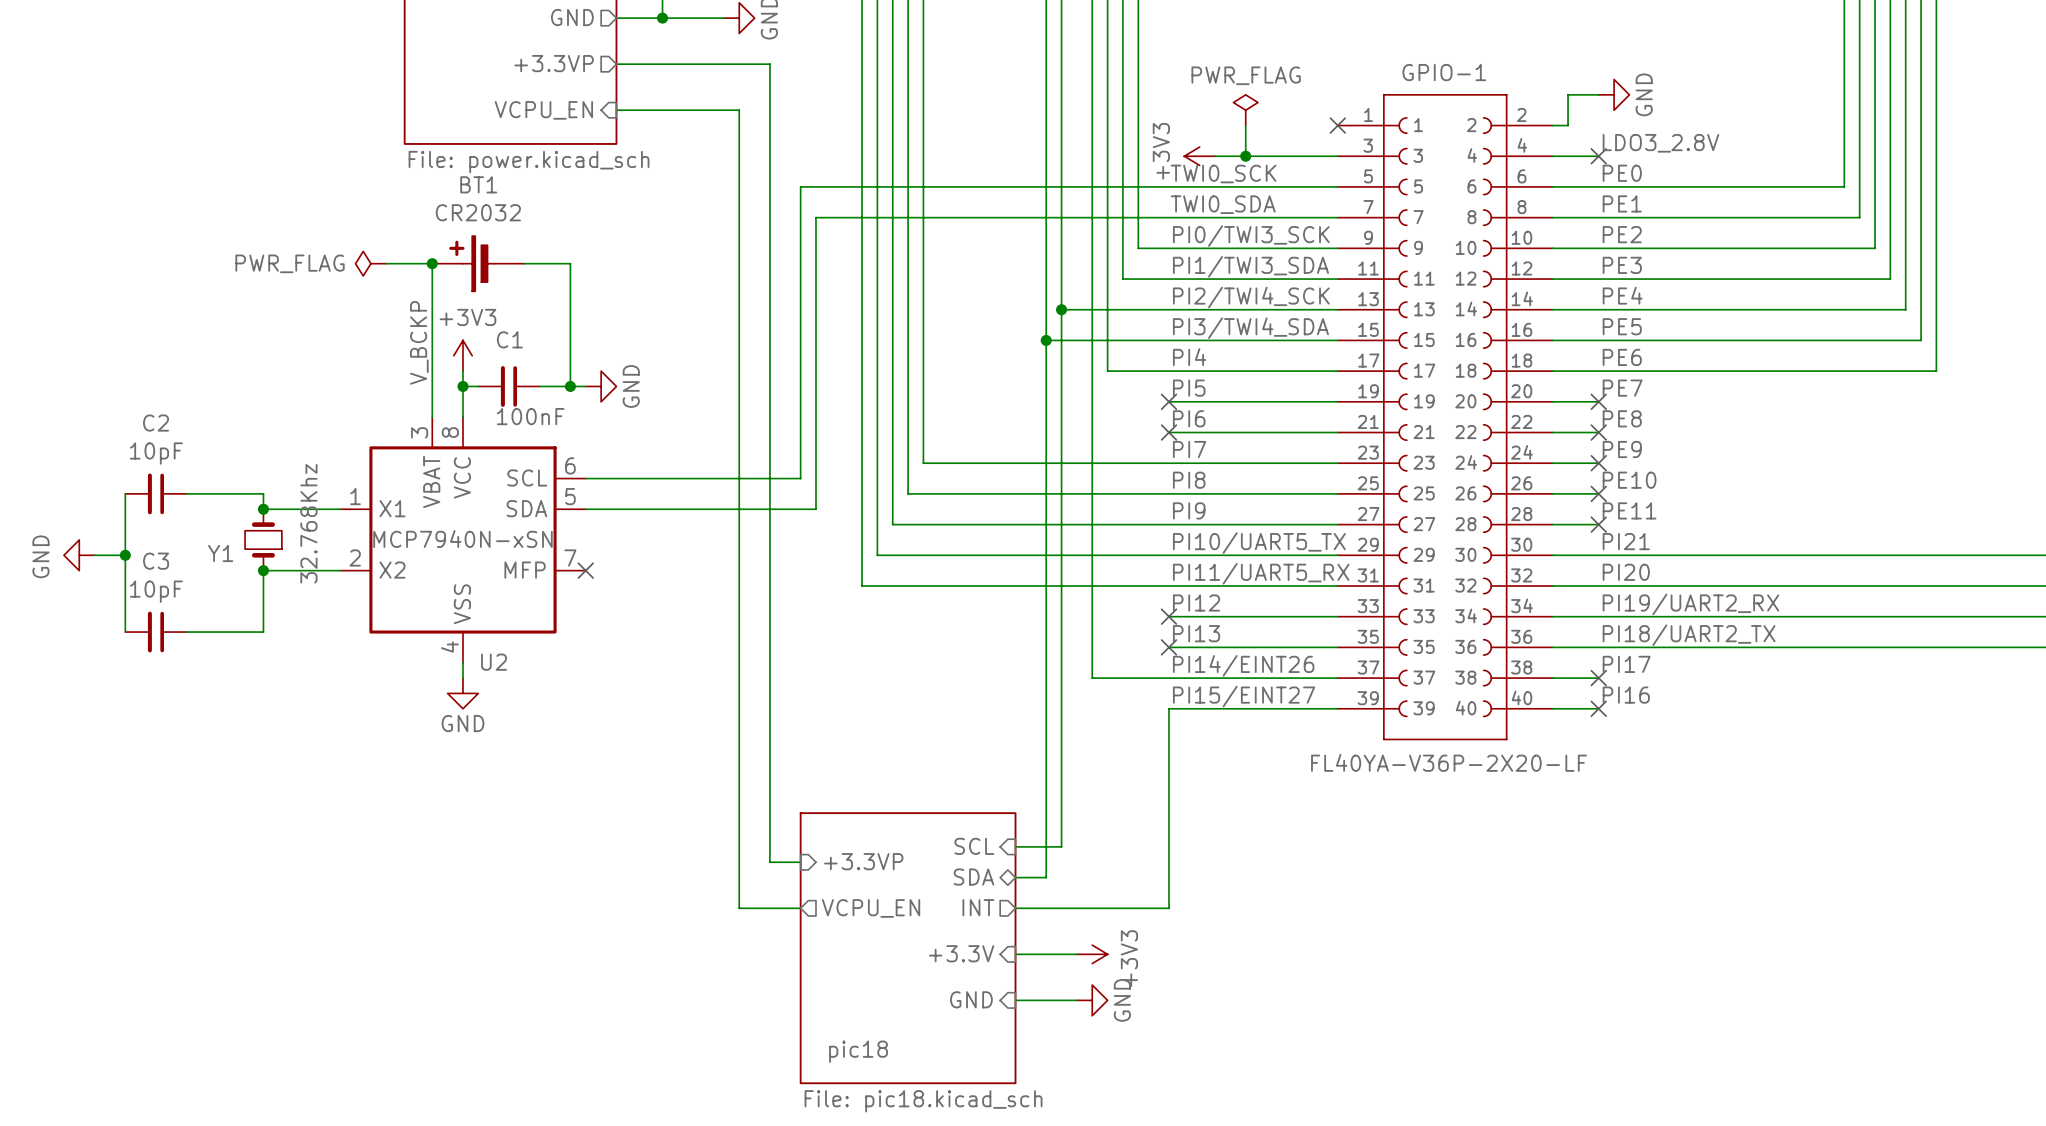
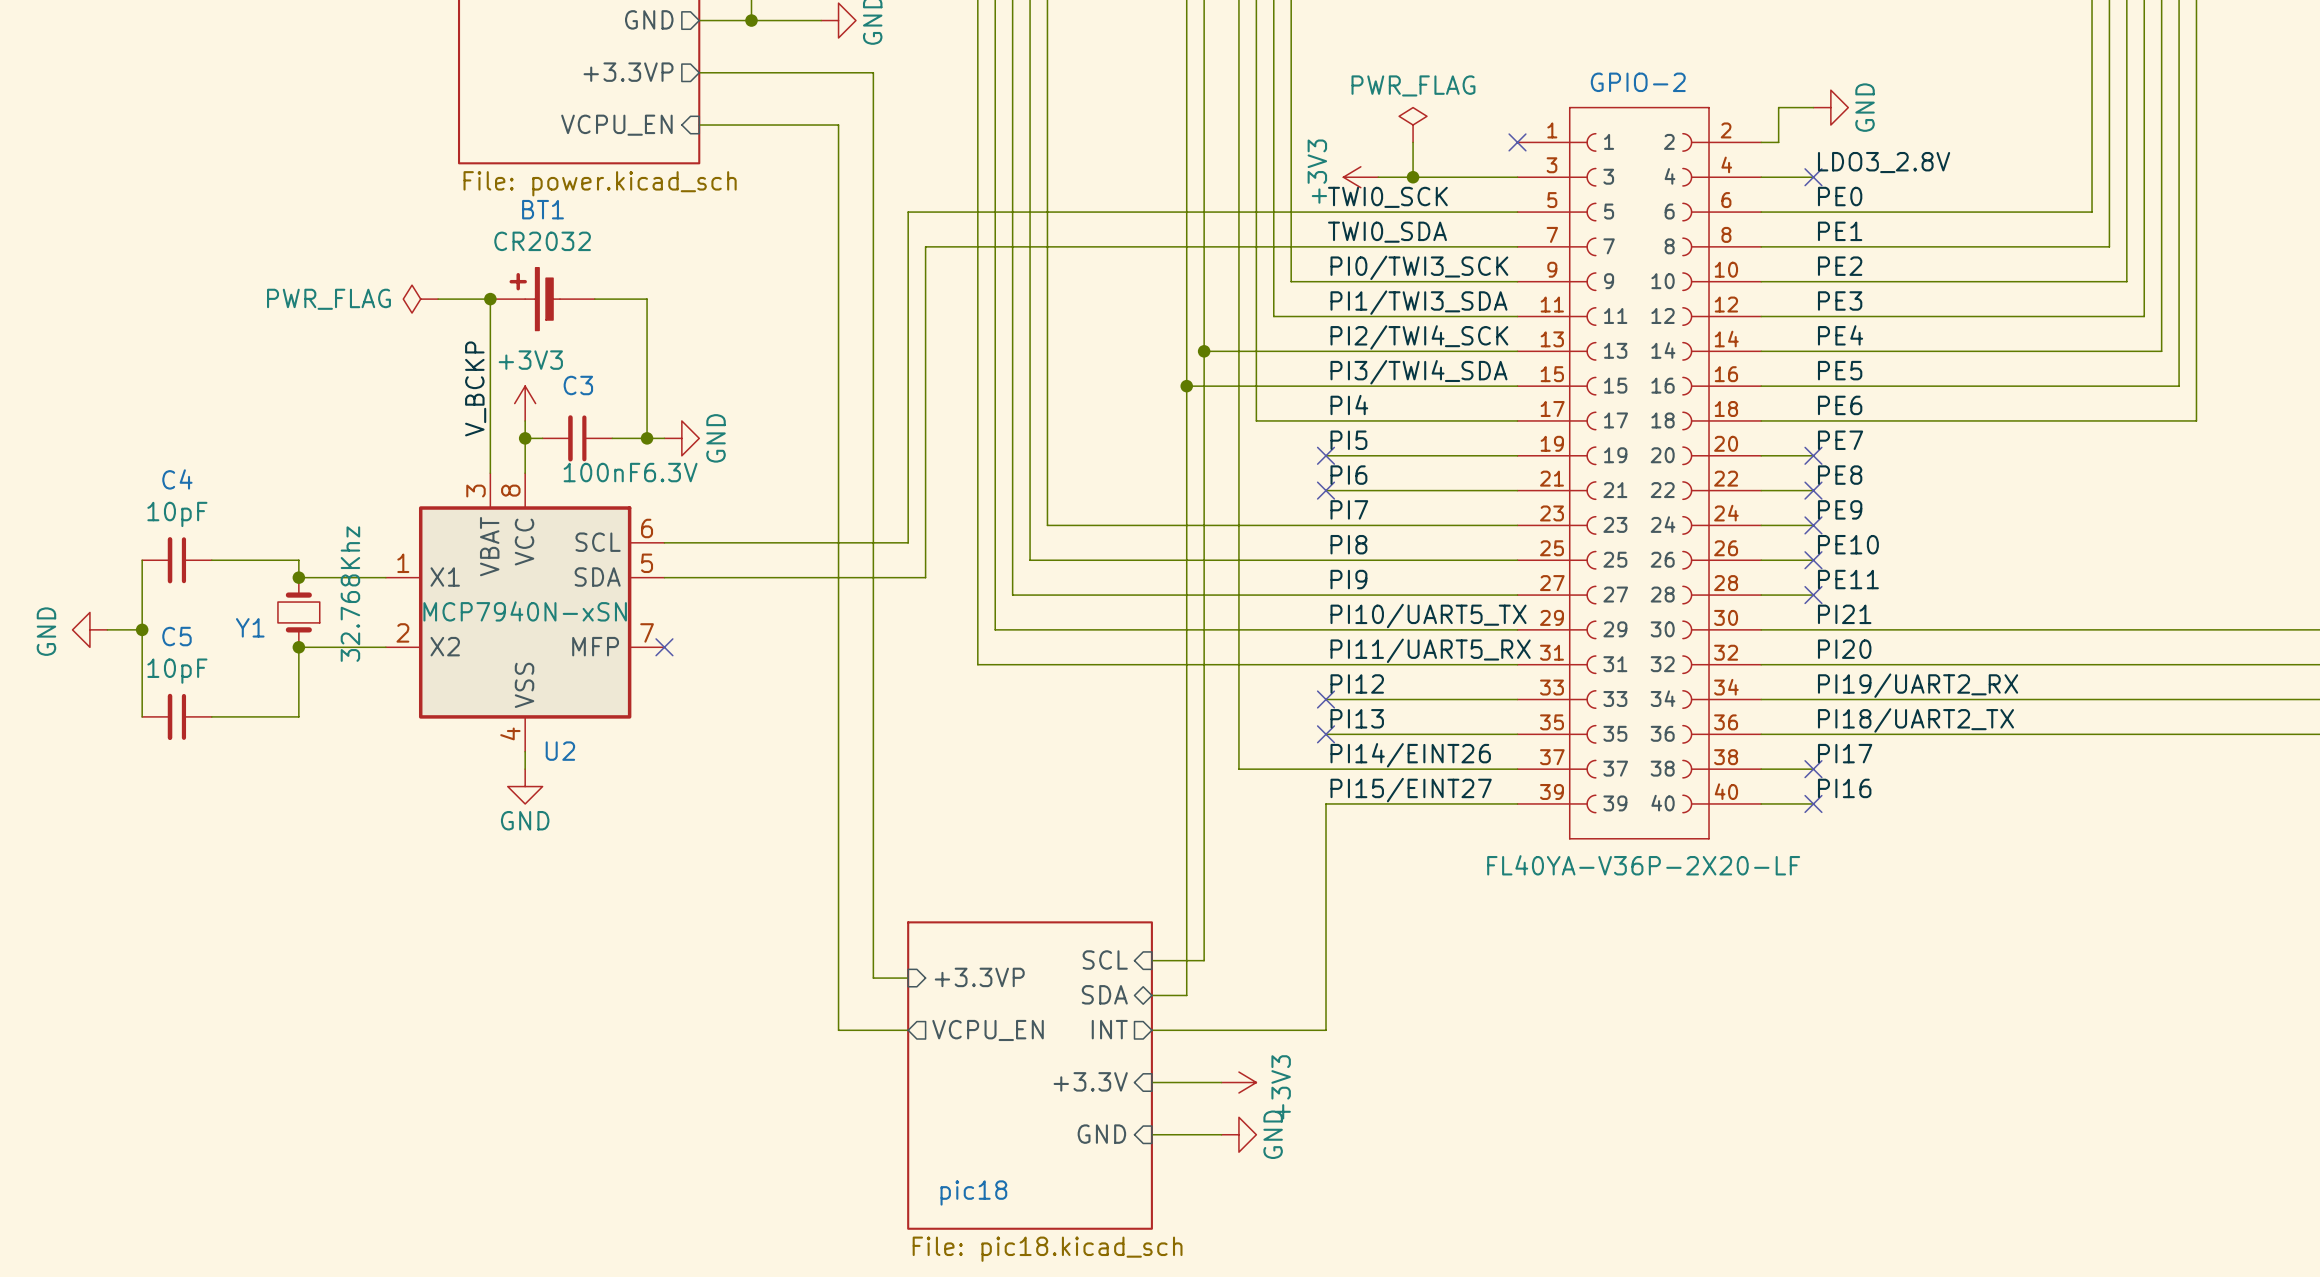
GPIO-1 name: GPIO-1 (1444, 72) -> GPIO-2 (1638, 82)
C1 name: C1 (509, 339) -> C3 (578, 385)
C1 value: 100nF (530, 416) -> 100nF6.3V (630, 472)
C2 name: C2 (156, 423) -> C4 (177, 479)
C3 name: C3 (156, 561) -> C5 (176, 636)

